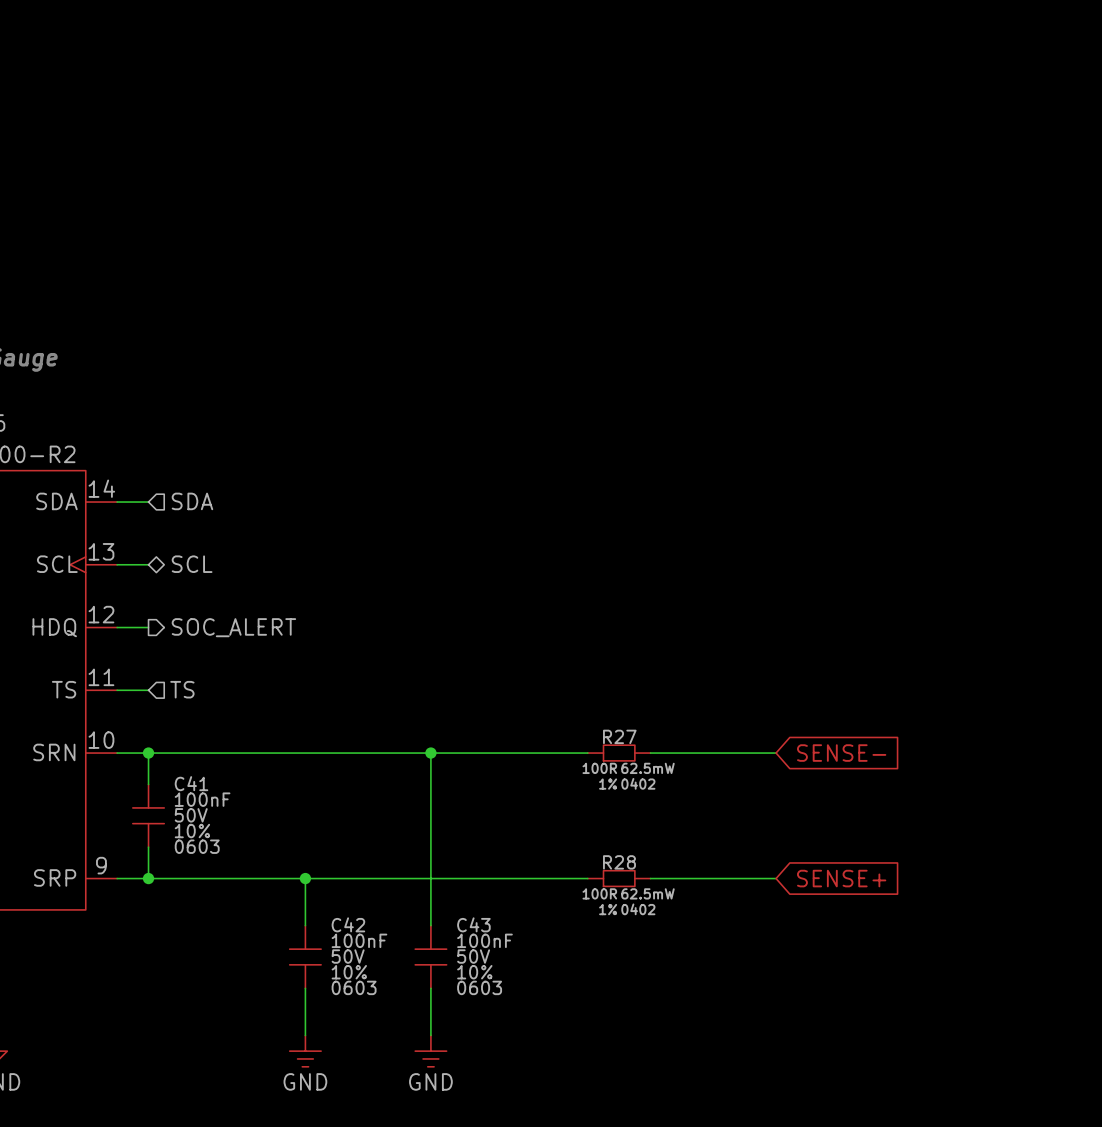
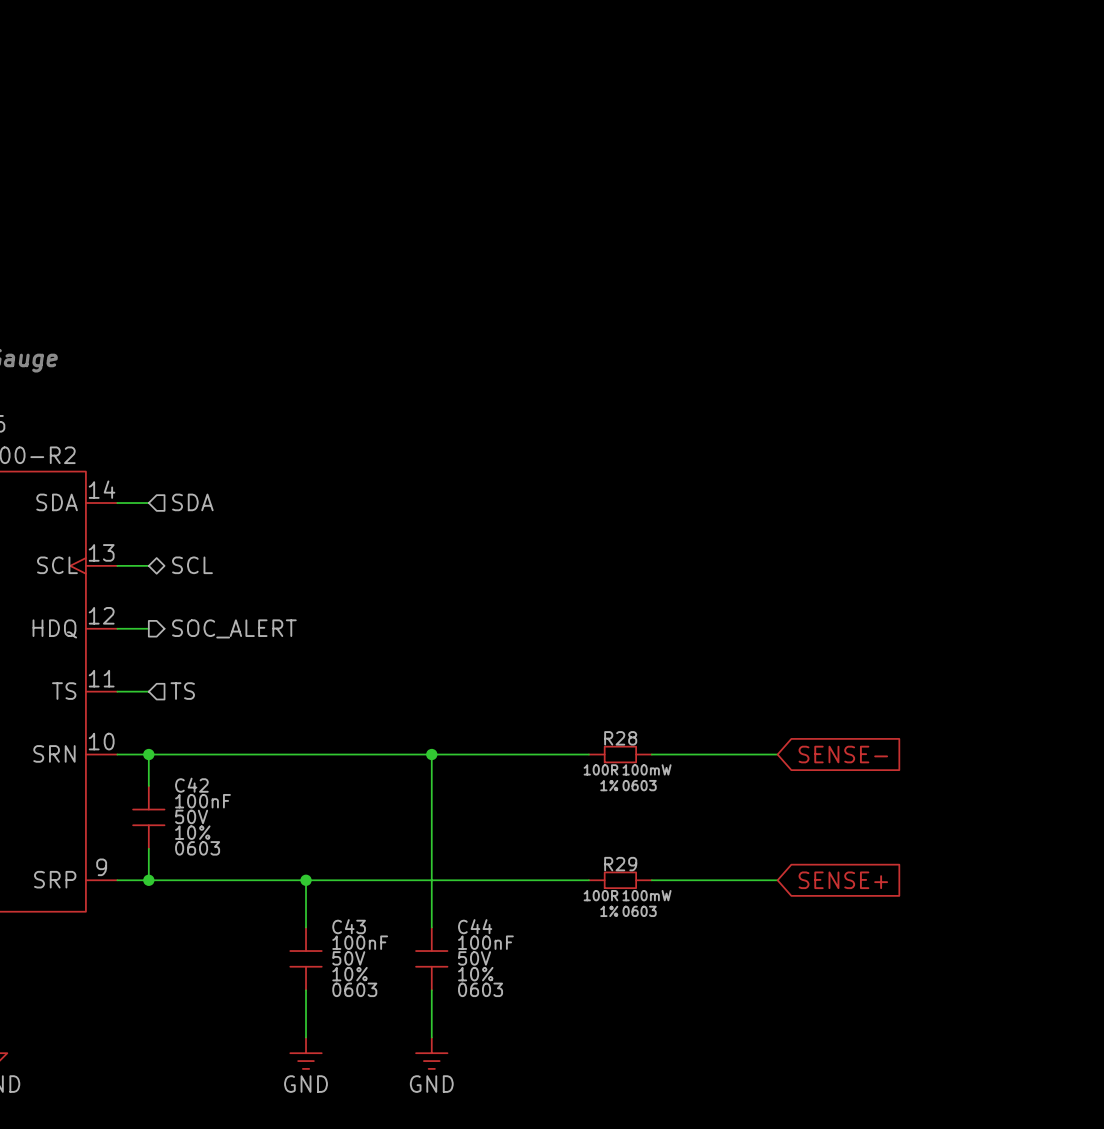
R27 name: R27 (619, 736) -> R28 (620, 738)
R27 text: 62.5mW (647, 768) -> 100mW (647, 769)
C41 name: C41 (191, 783) -> C42 (191, 785)
R27 text: 0402 (638, 783) -> 0603 (639, 785)
R28 name: R28 (619, 862) -> R29 (620, 864)
R28 text: 62.5mW (647, 893) -> 100mW (647, 895)
R28 text: 0402 (638, 909) -> 0603 (639, 911)
C42 name: C42 (348, 924) -> C43 (349, 926)
C43 name: C43 (473, 924) -> C44 (475, 926)

